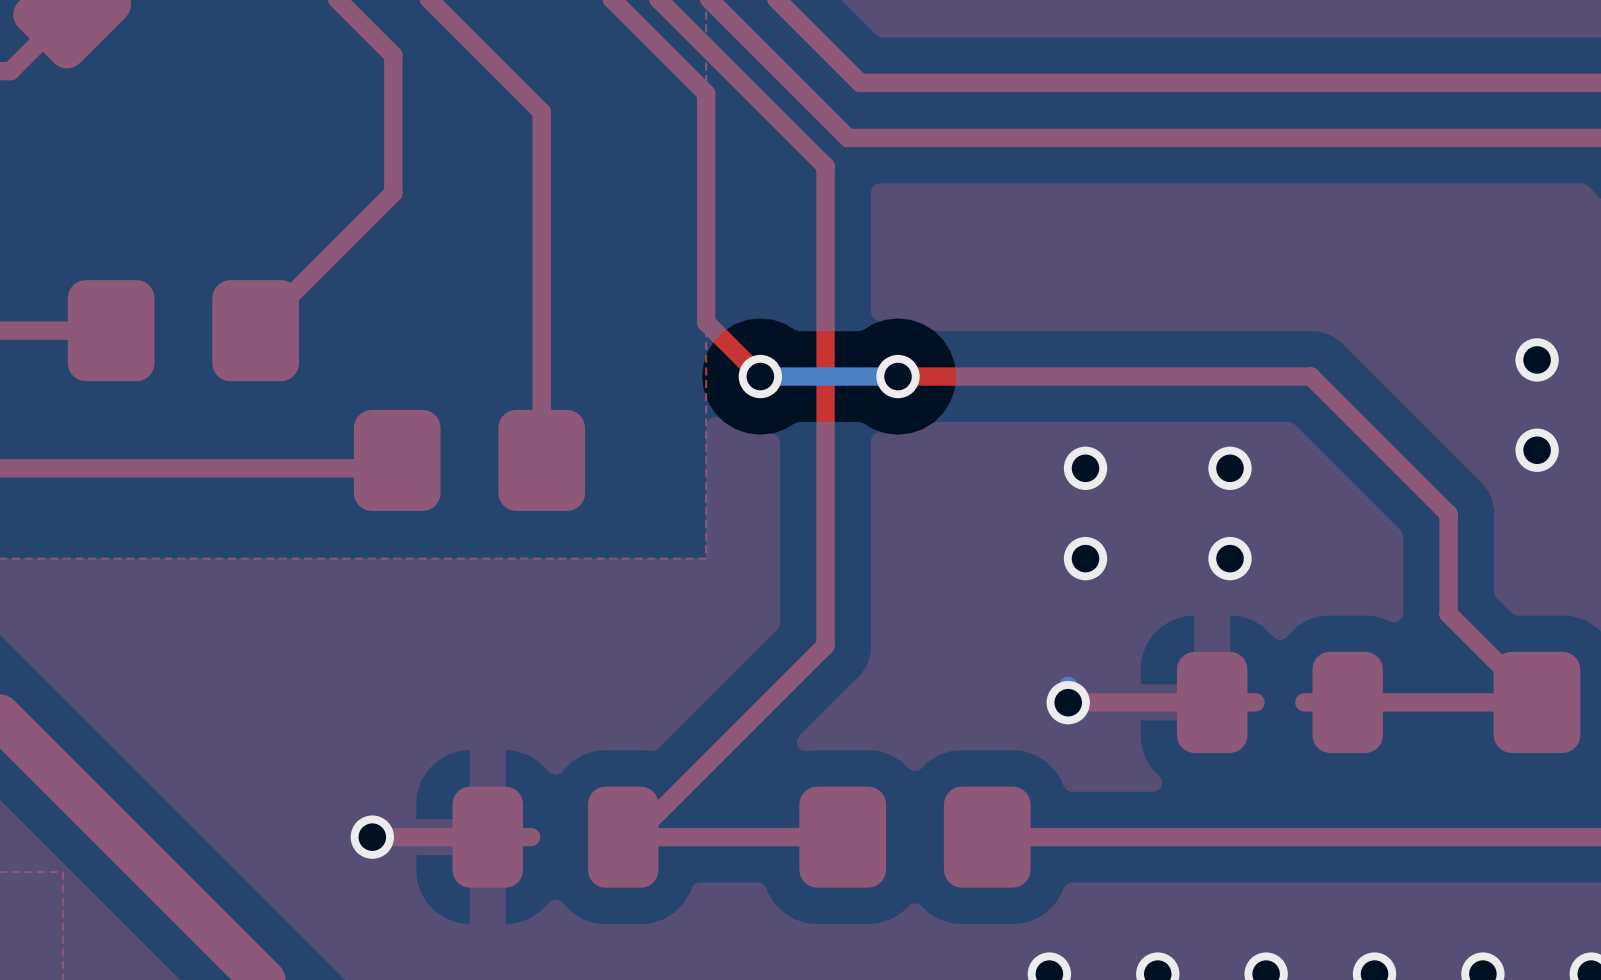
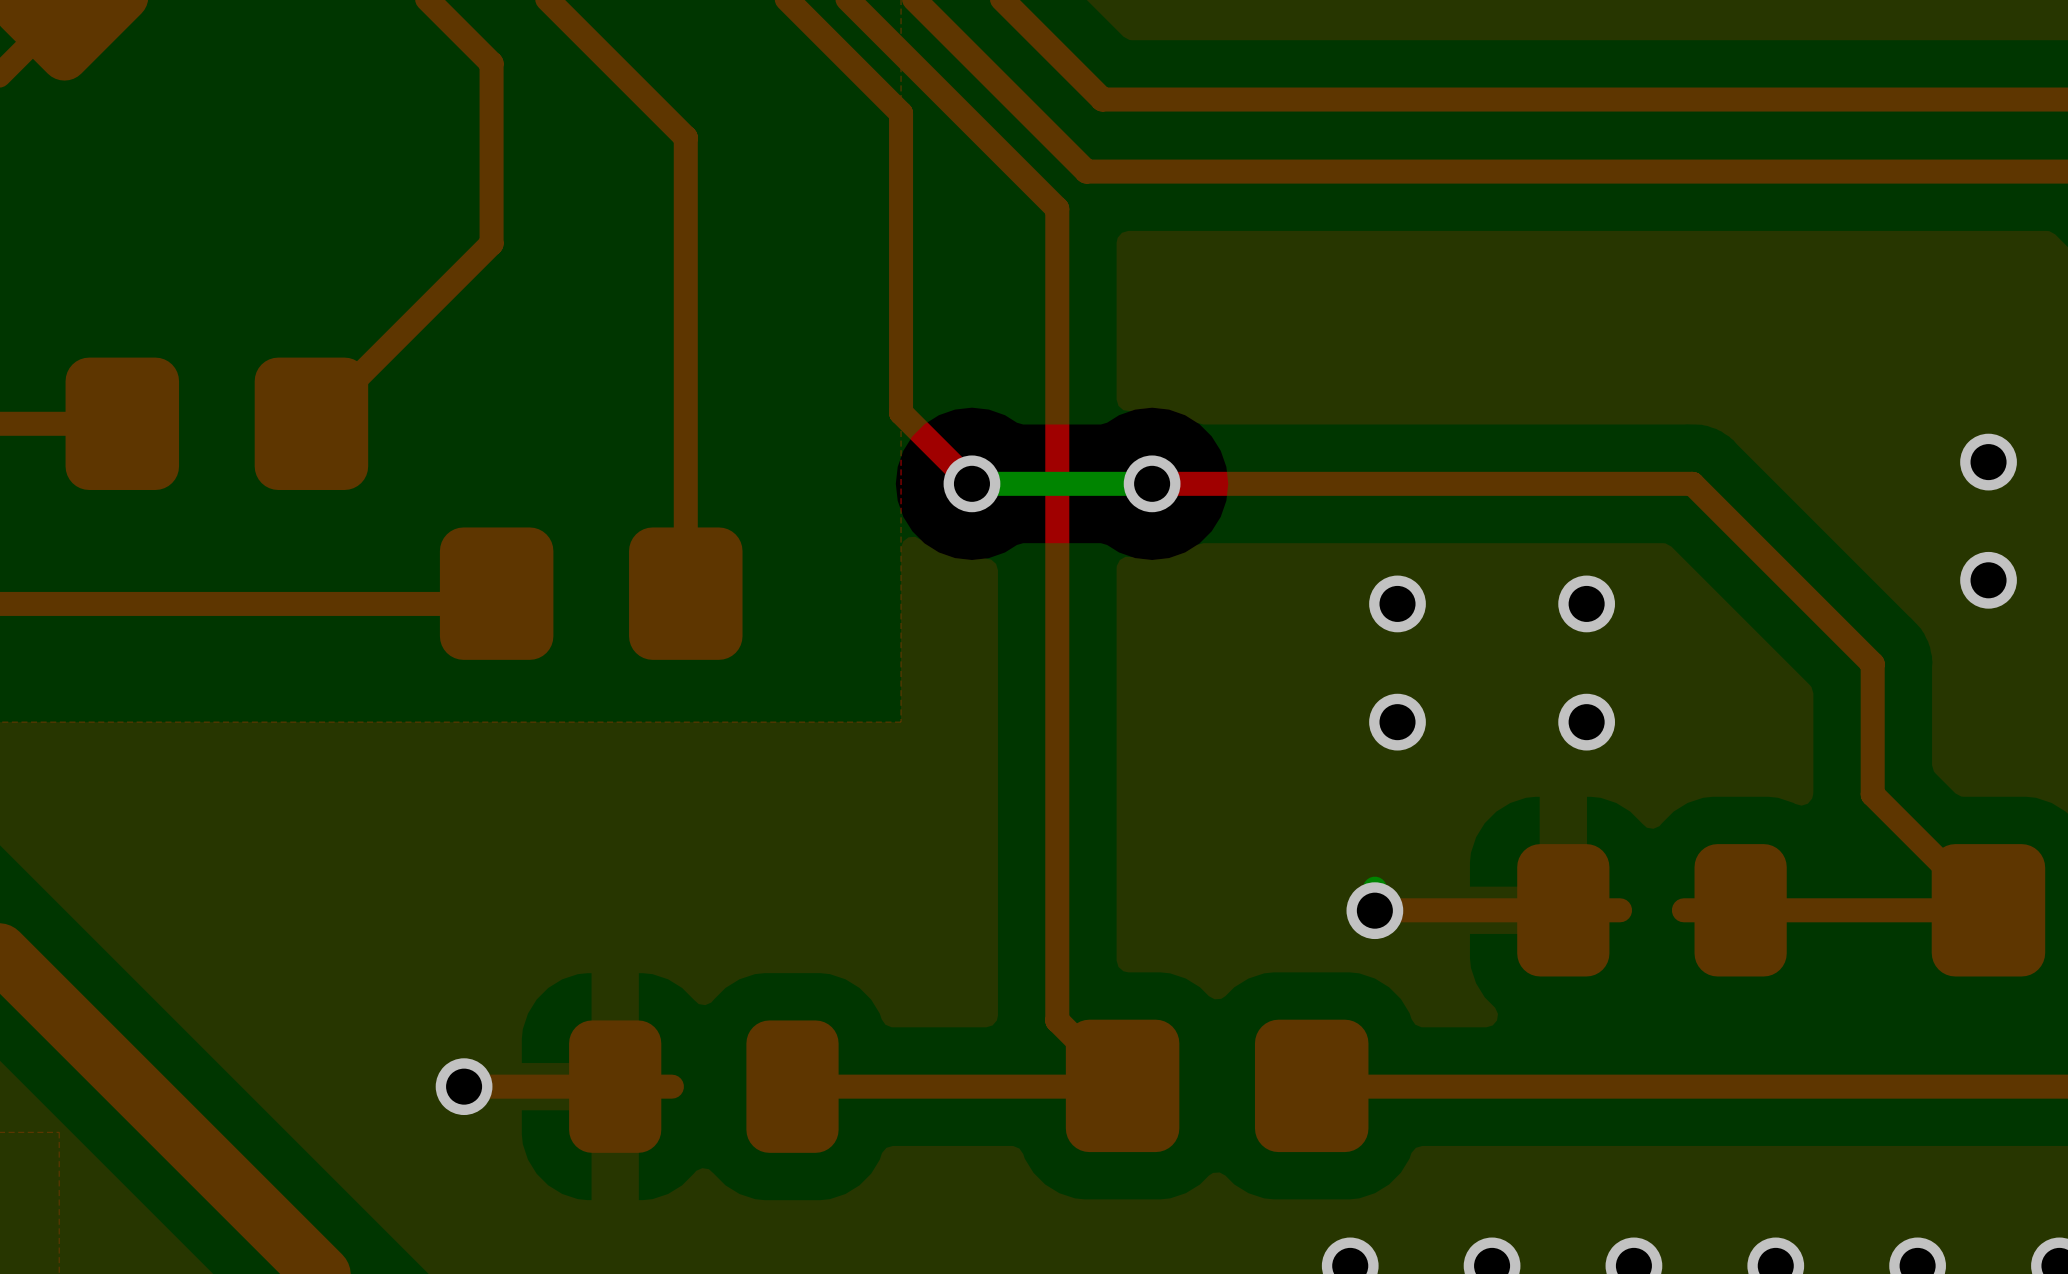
top track: (825, 645) (633, 837) -> (1057, 835) (1057, 1020) (1122, 1085)
part position: (914, 837) -> (1217, 1085)

